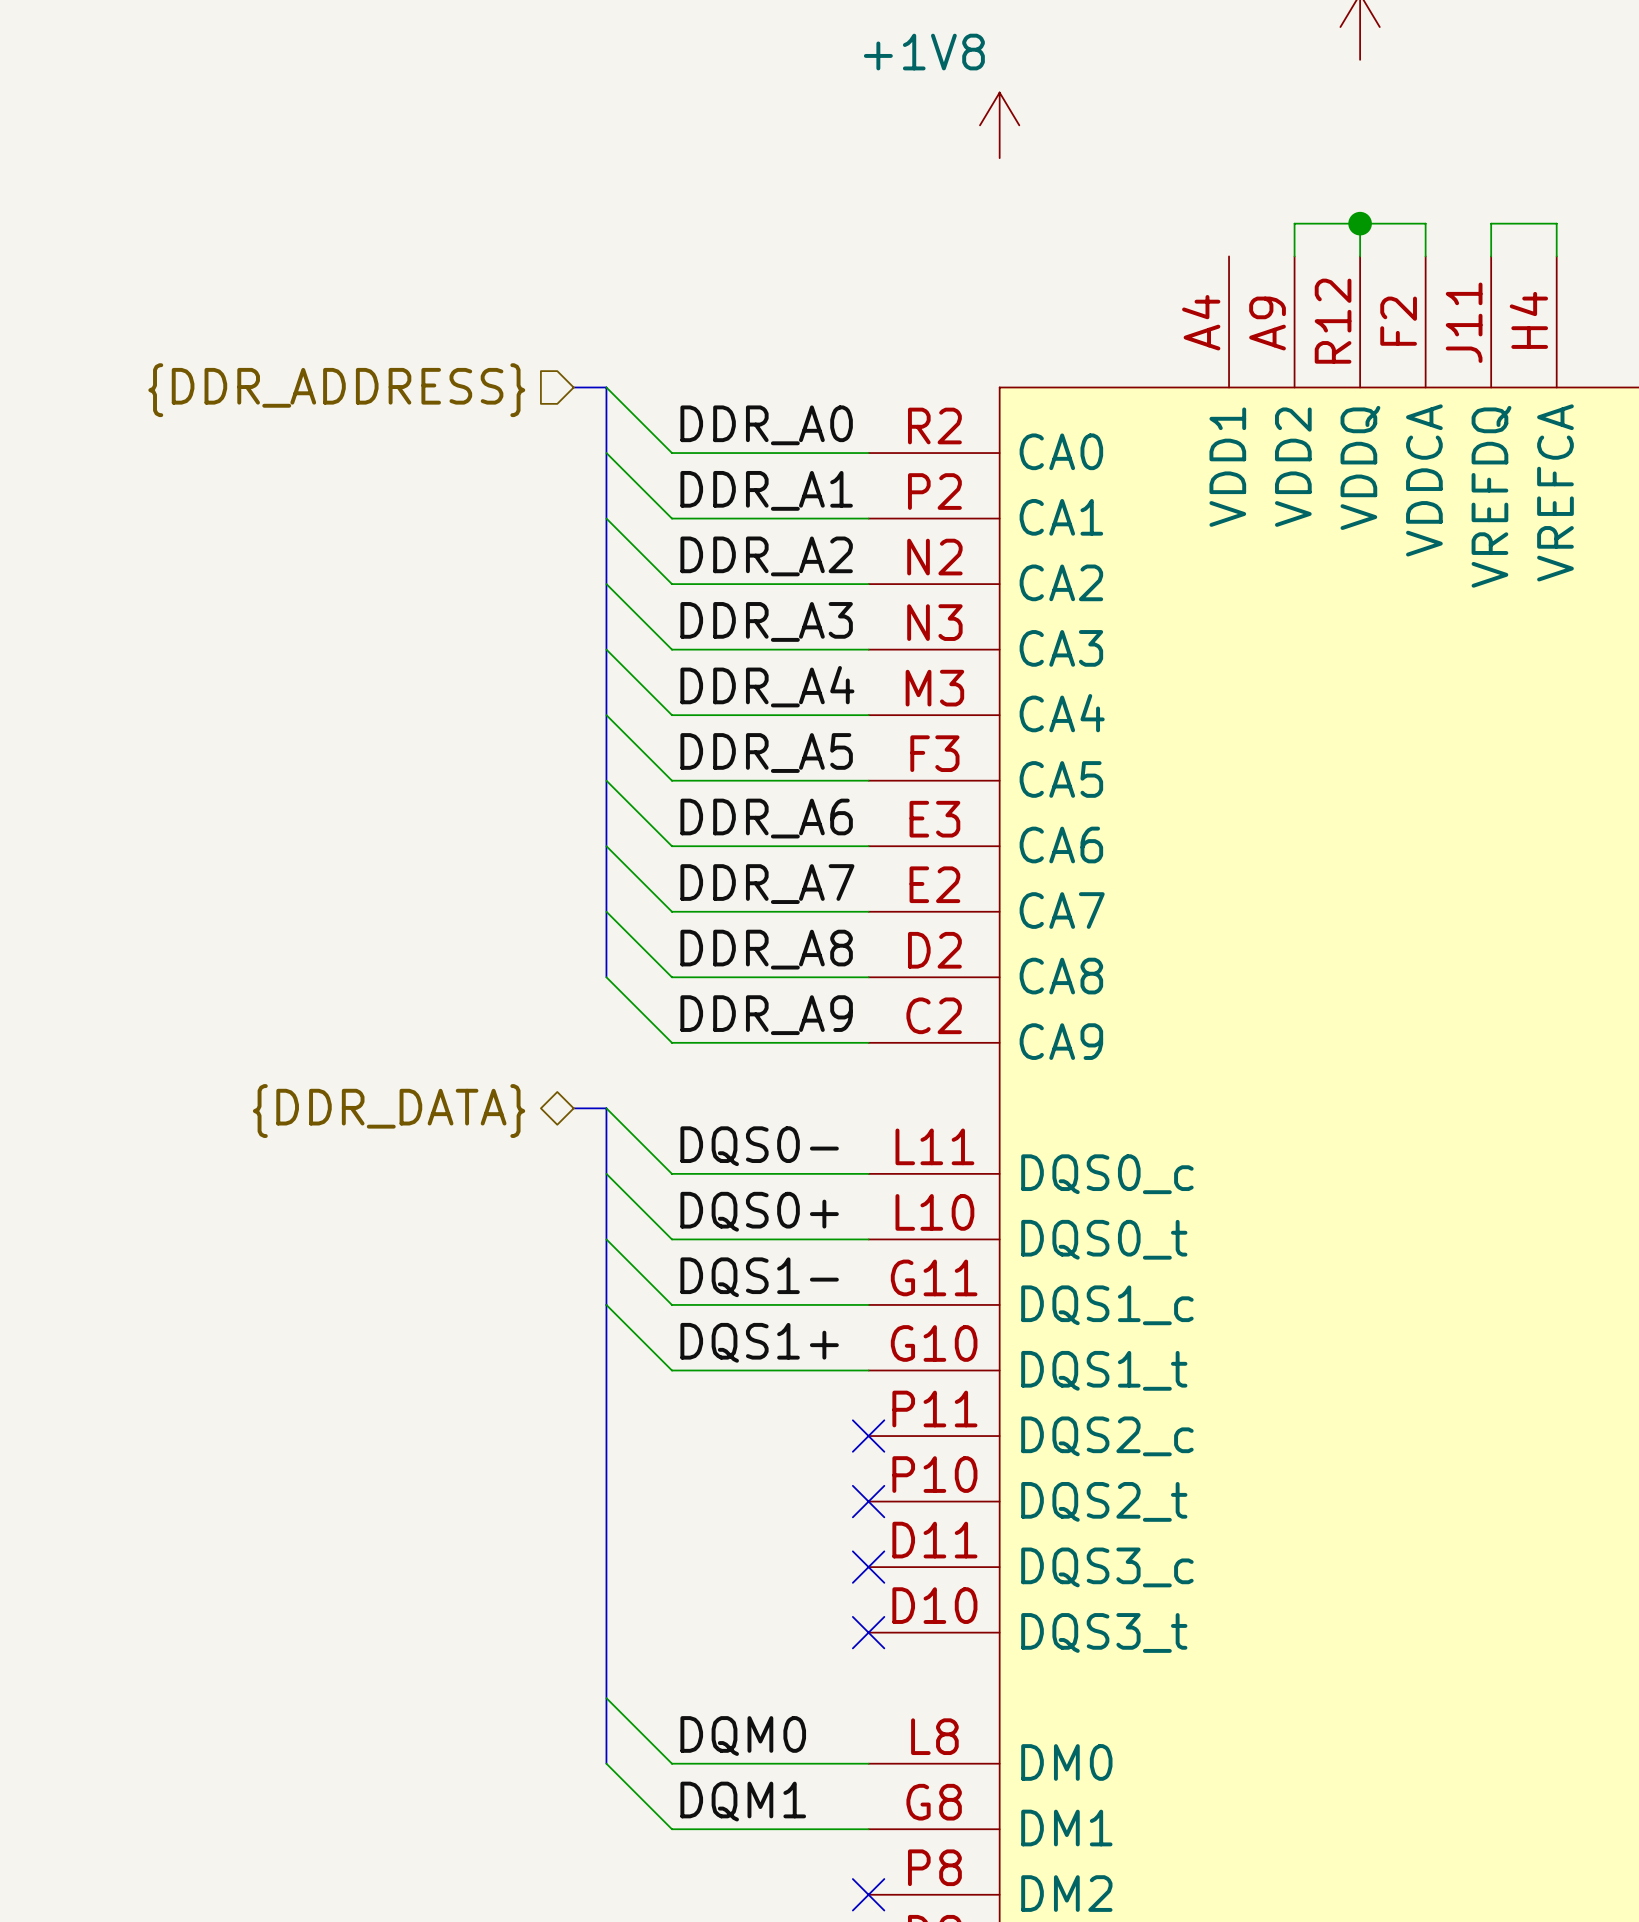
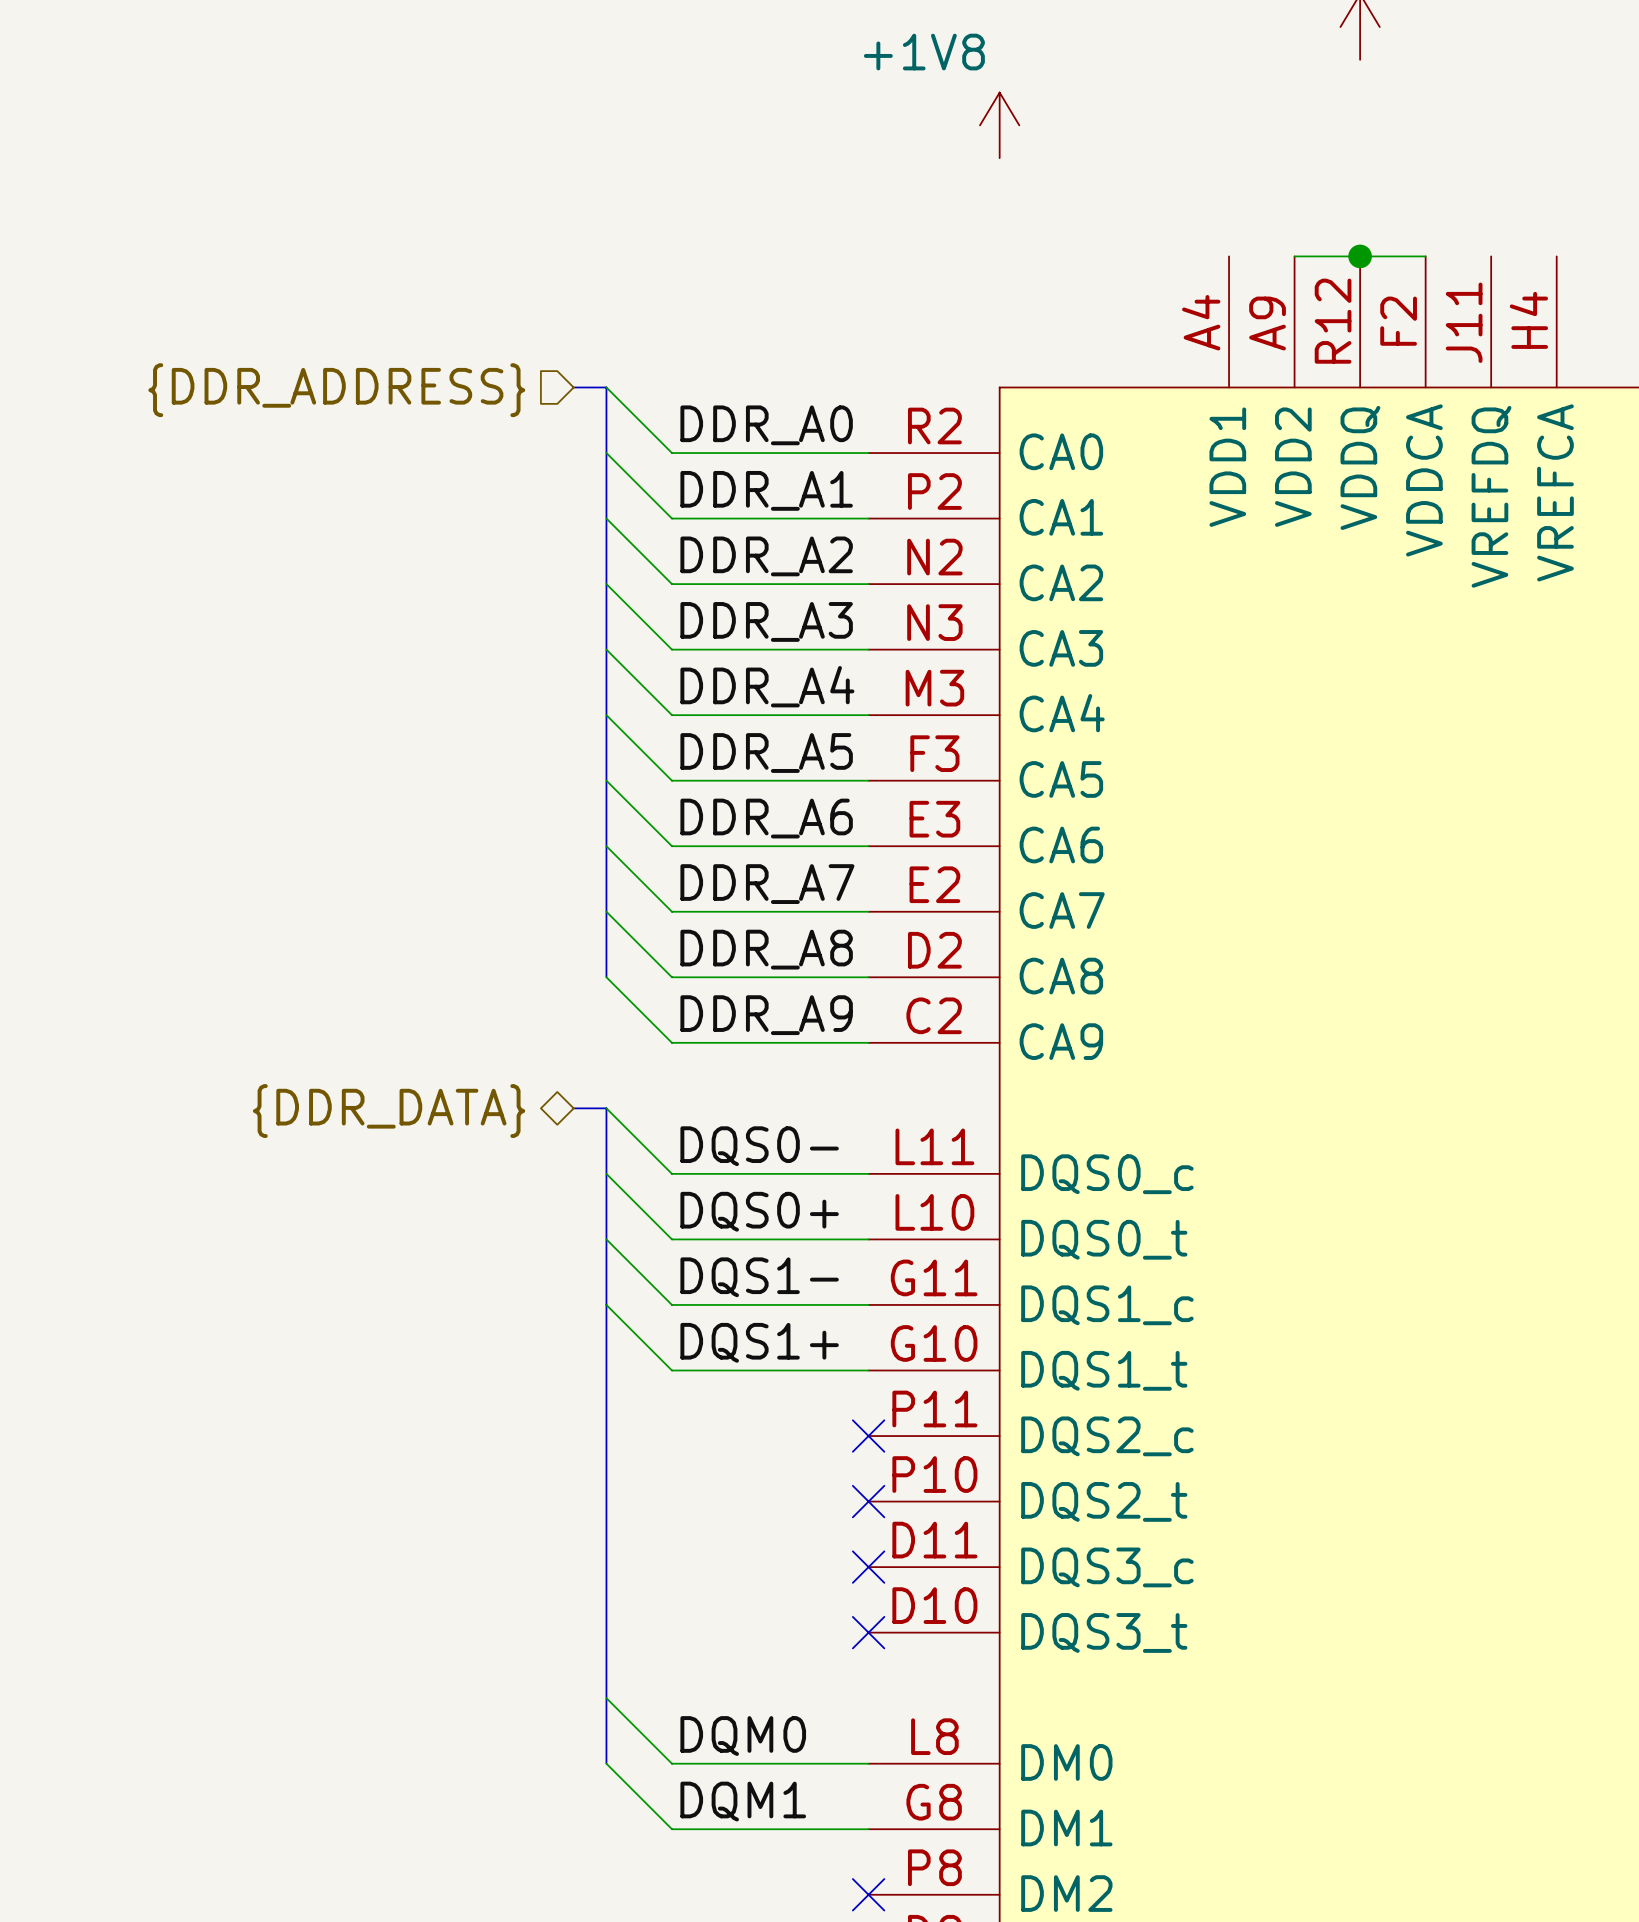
wire: (1360, 223) (1360, 256) -> none
junction position: (1360, 223) -> (1360, 256)
wire: (1294, 256) (1294, 223) (1425, 223) (1425, 256) -> (1294, 256) (1425, 256)
wire: (1491, 256) (1491, 223) (1556, 223) (1556, 256) -> none

